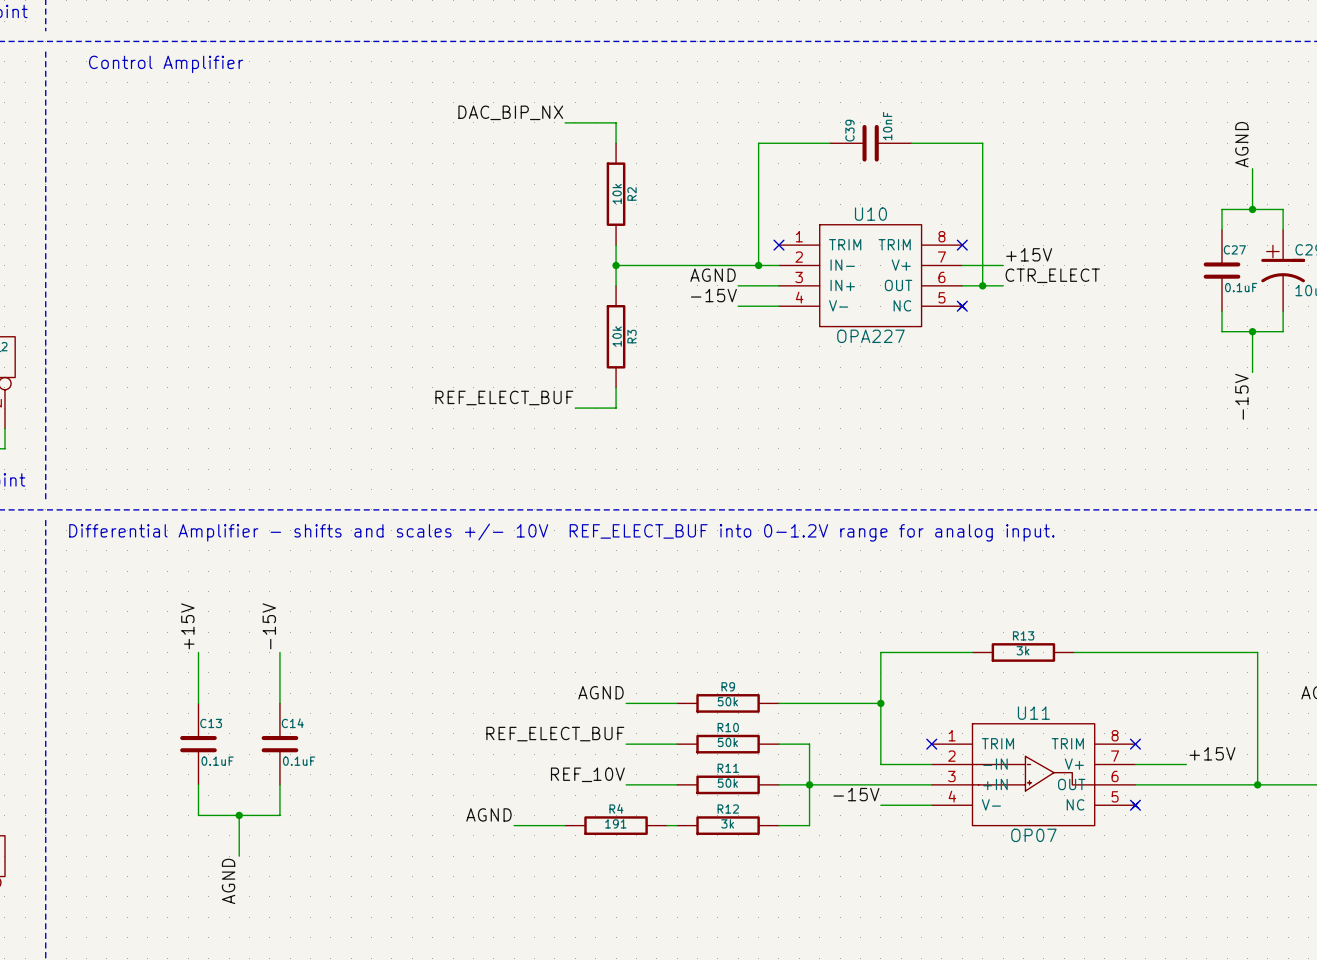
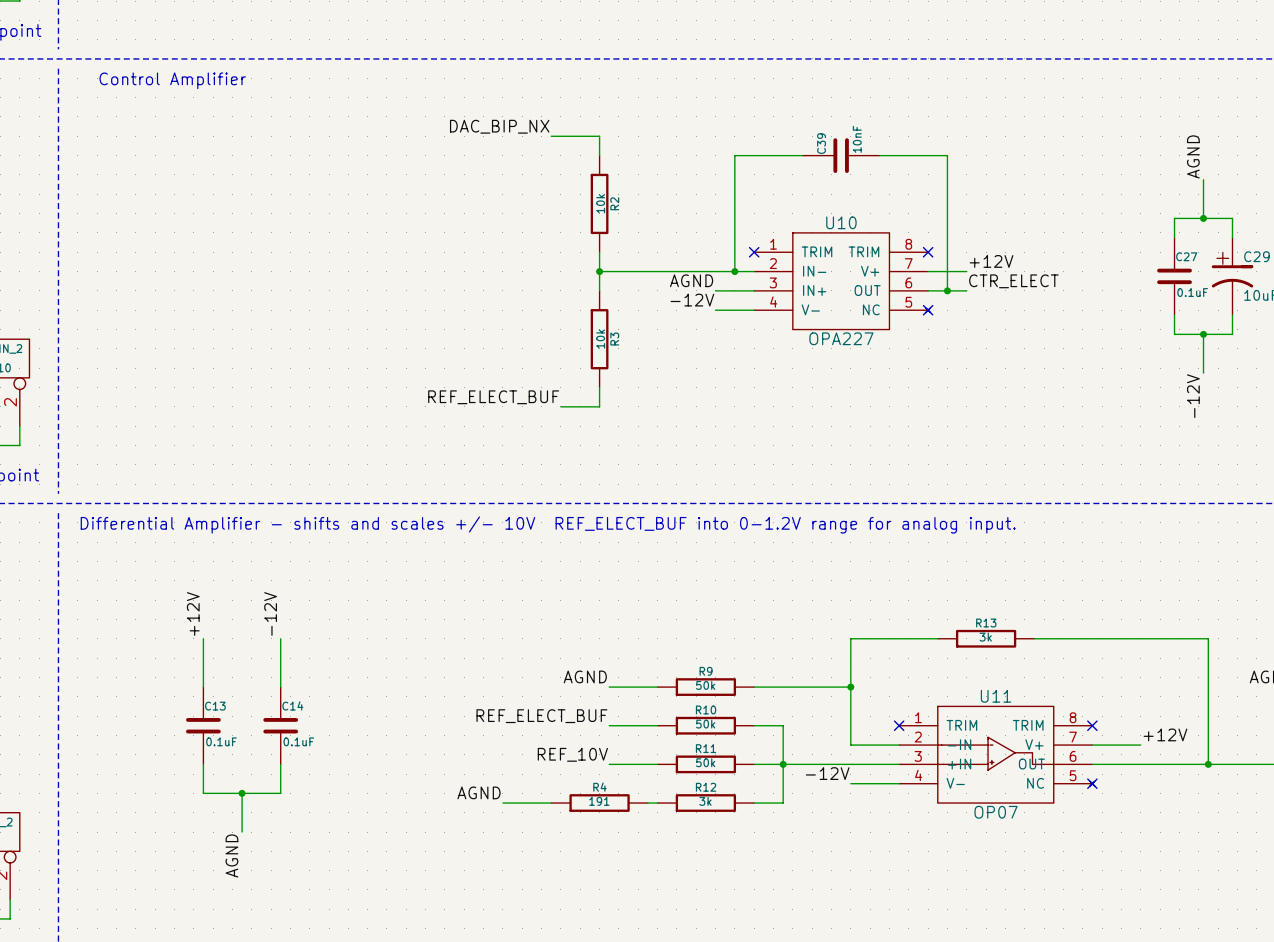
label: +15V (1029, 254) -> +12V (991, 261)
label: -15V (713, 295) -> -12V (692, 300)
label: -15V (1241, 396) -> -12V (1193, 396)
label: +15V (187, 626) -> +12V (193, 613)
label: -15V (269, 626) -> -12V (270, 613)
label: +15V (1212, 753) -> +12V (1165, 734)
label: -15V (856, 794) -> -12V (827, 773)

